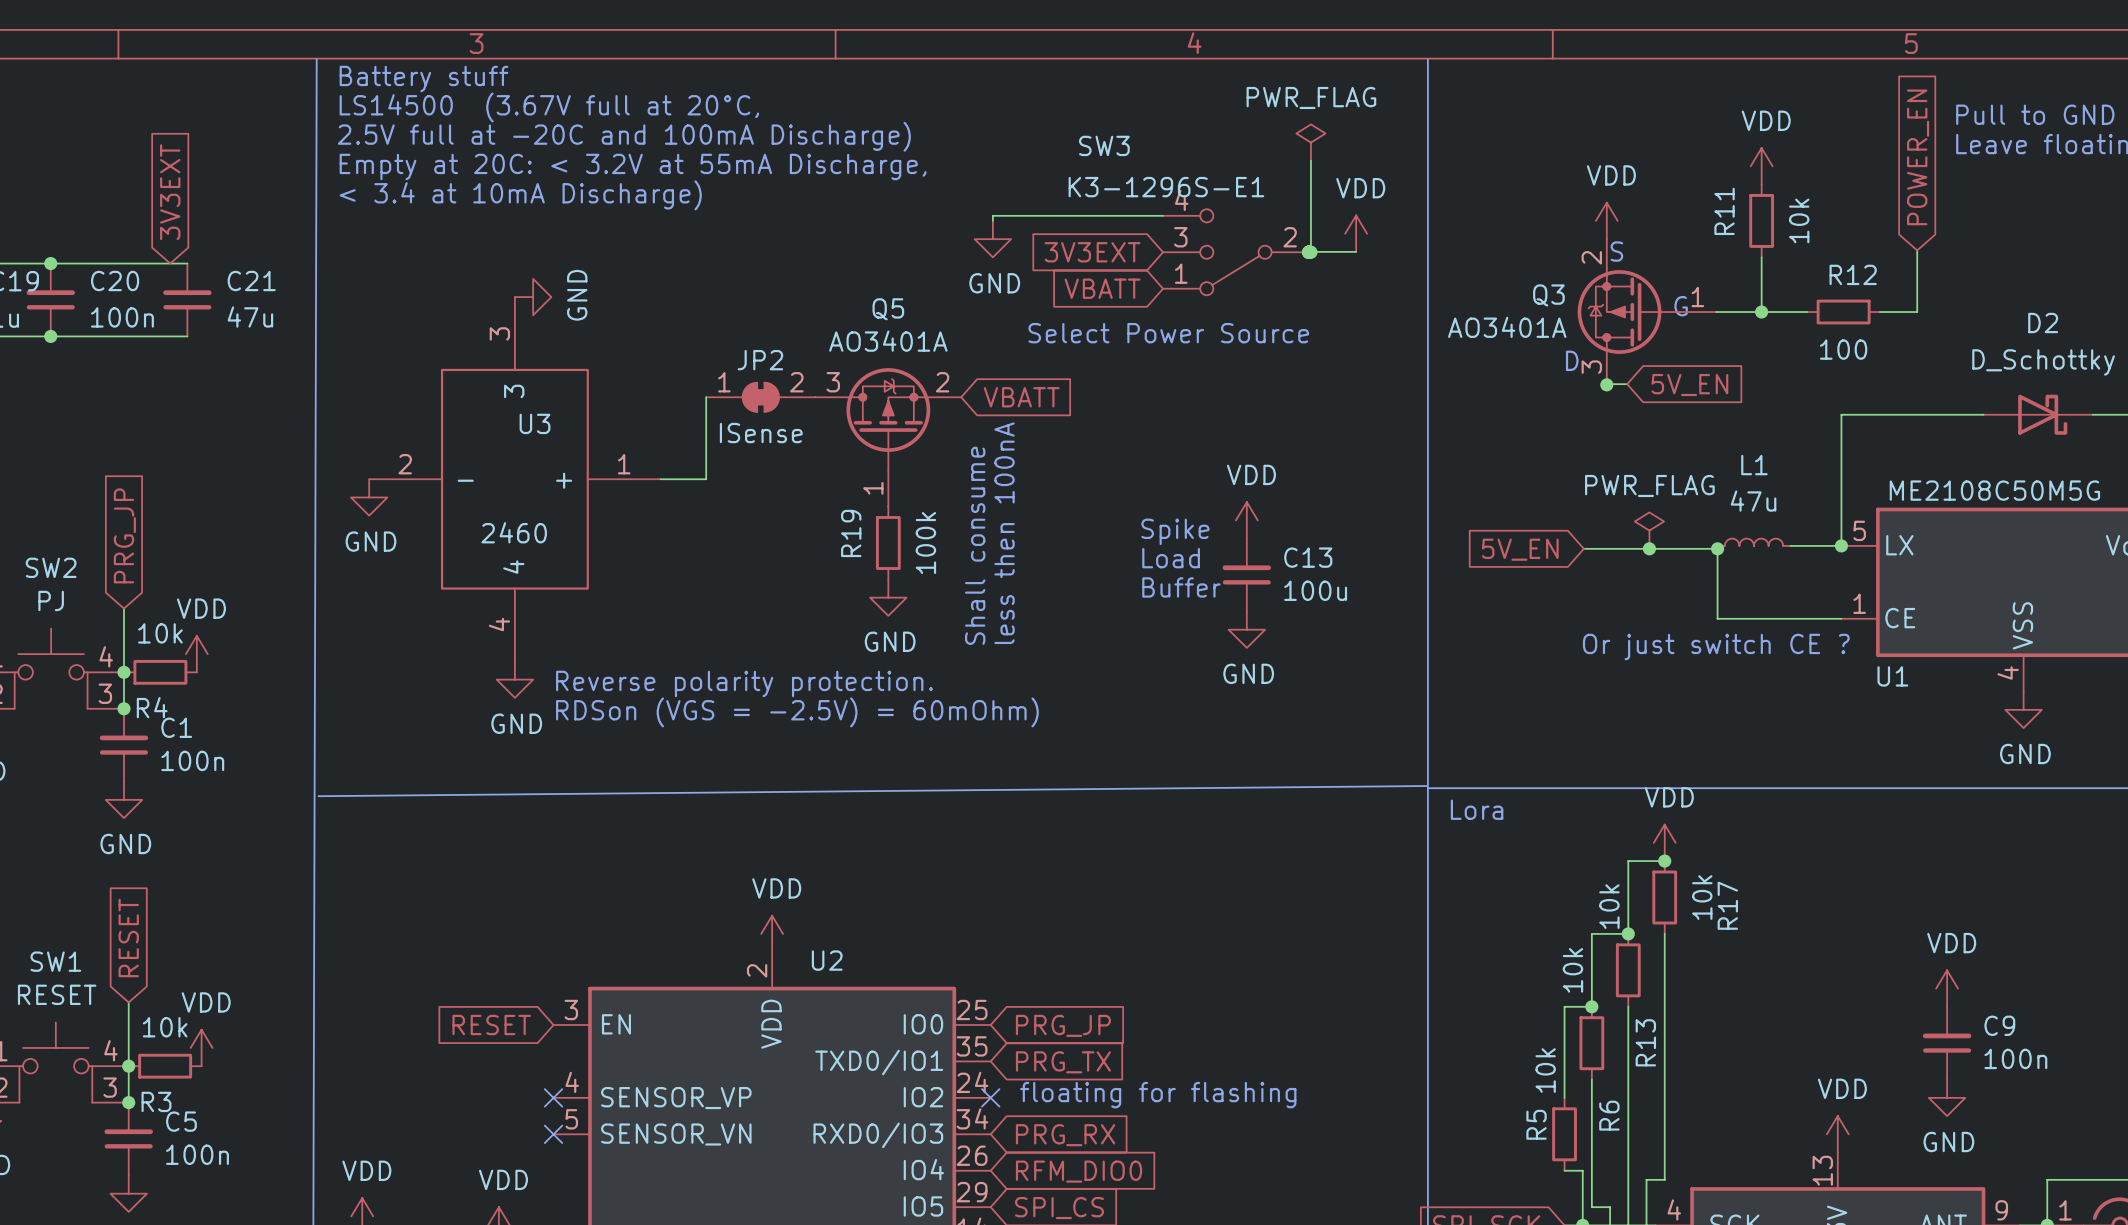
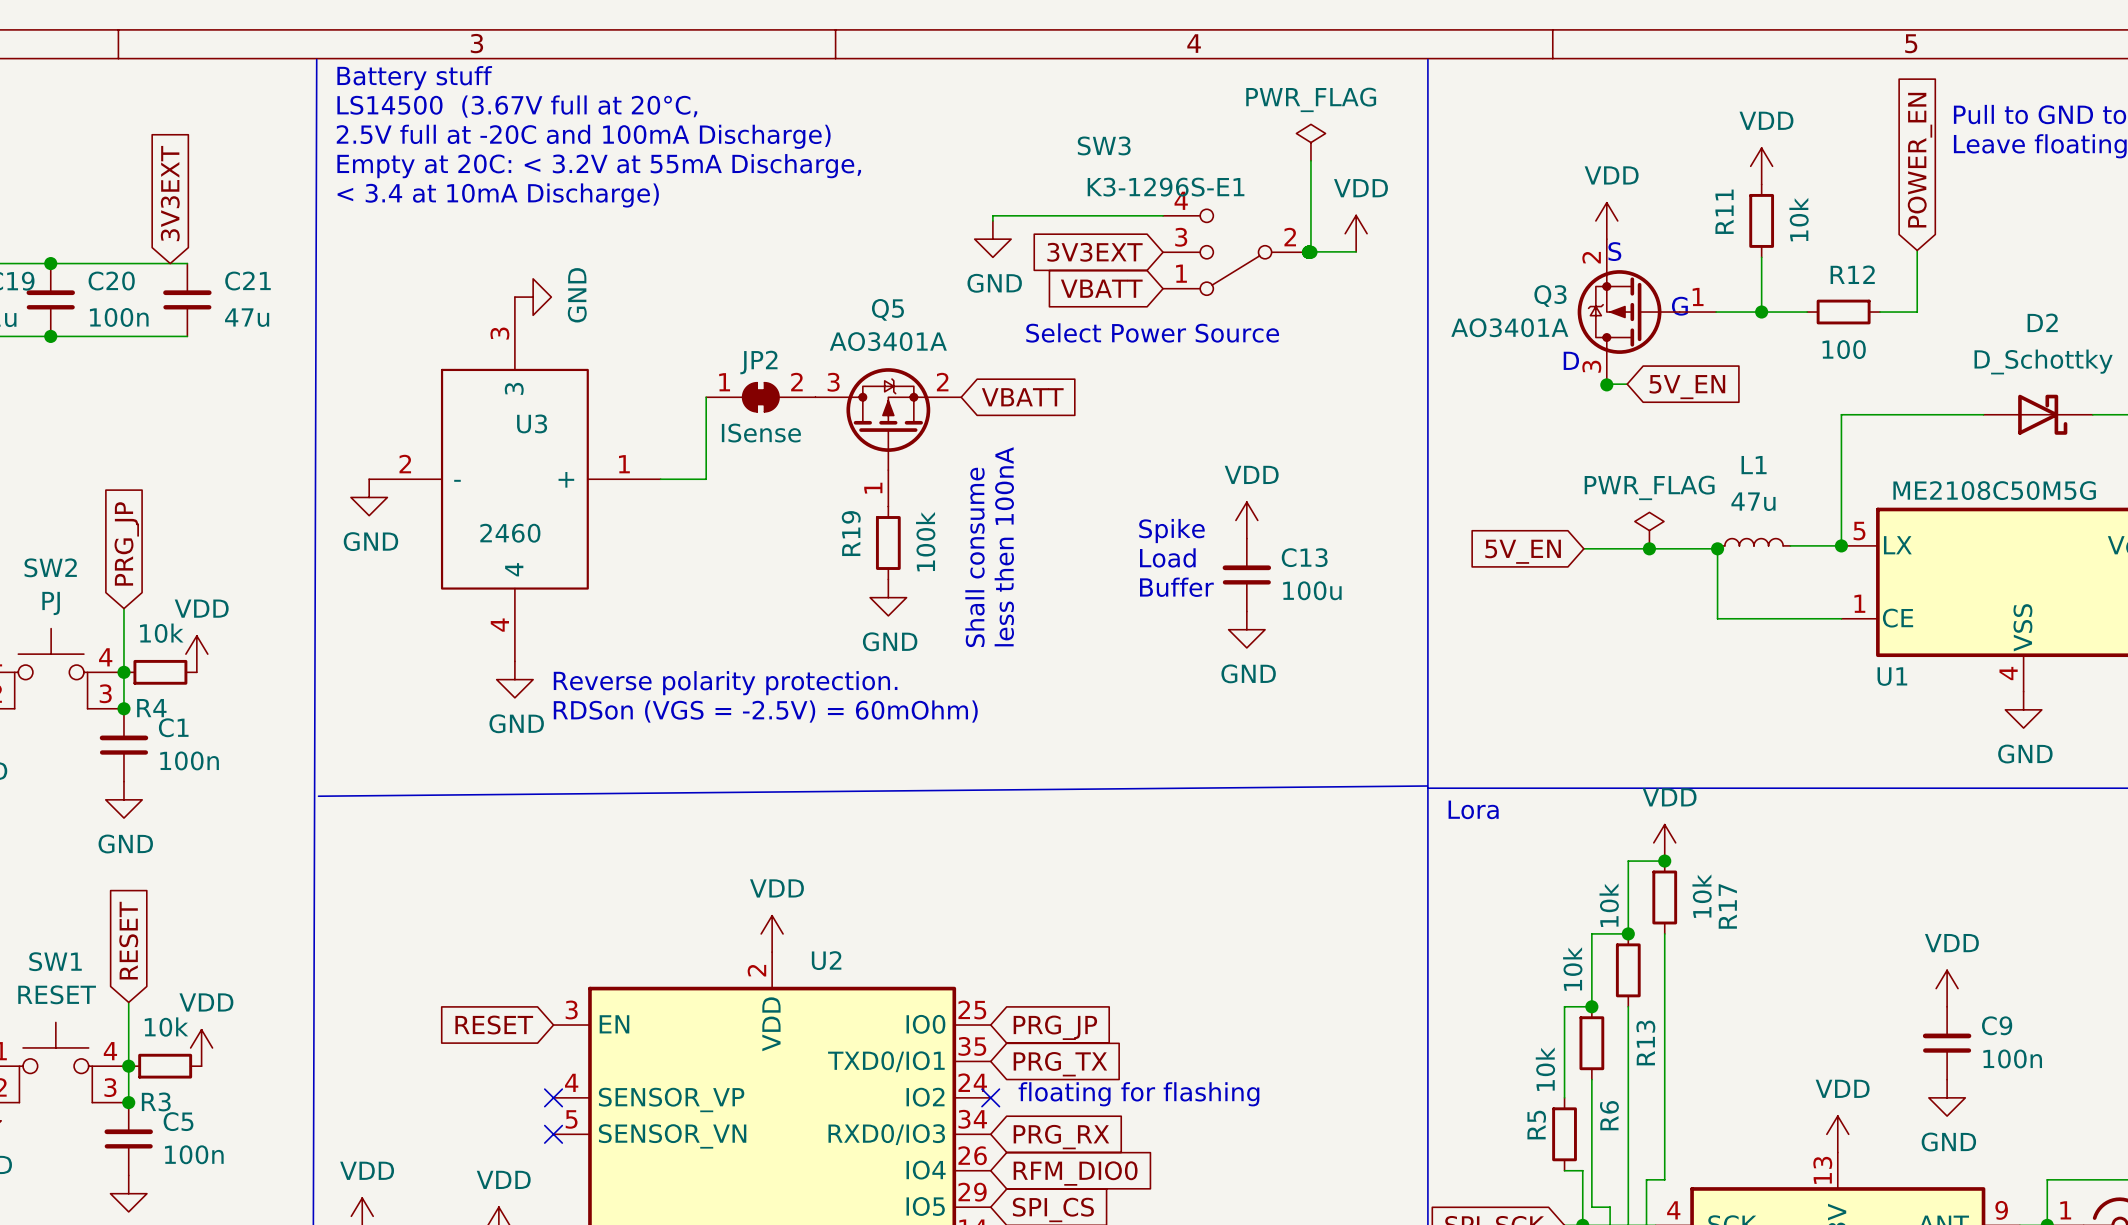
text: Or just switch CE ? (1716, 646) -> none

